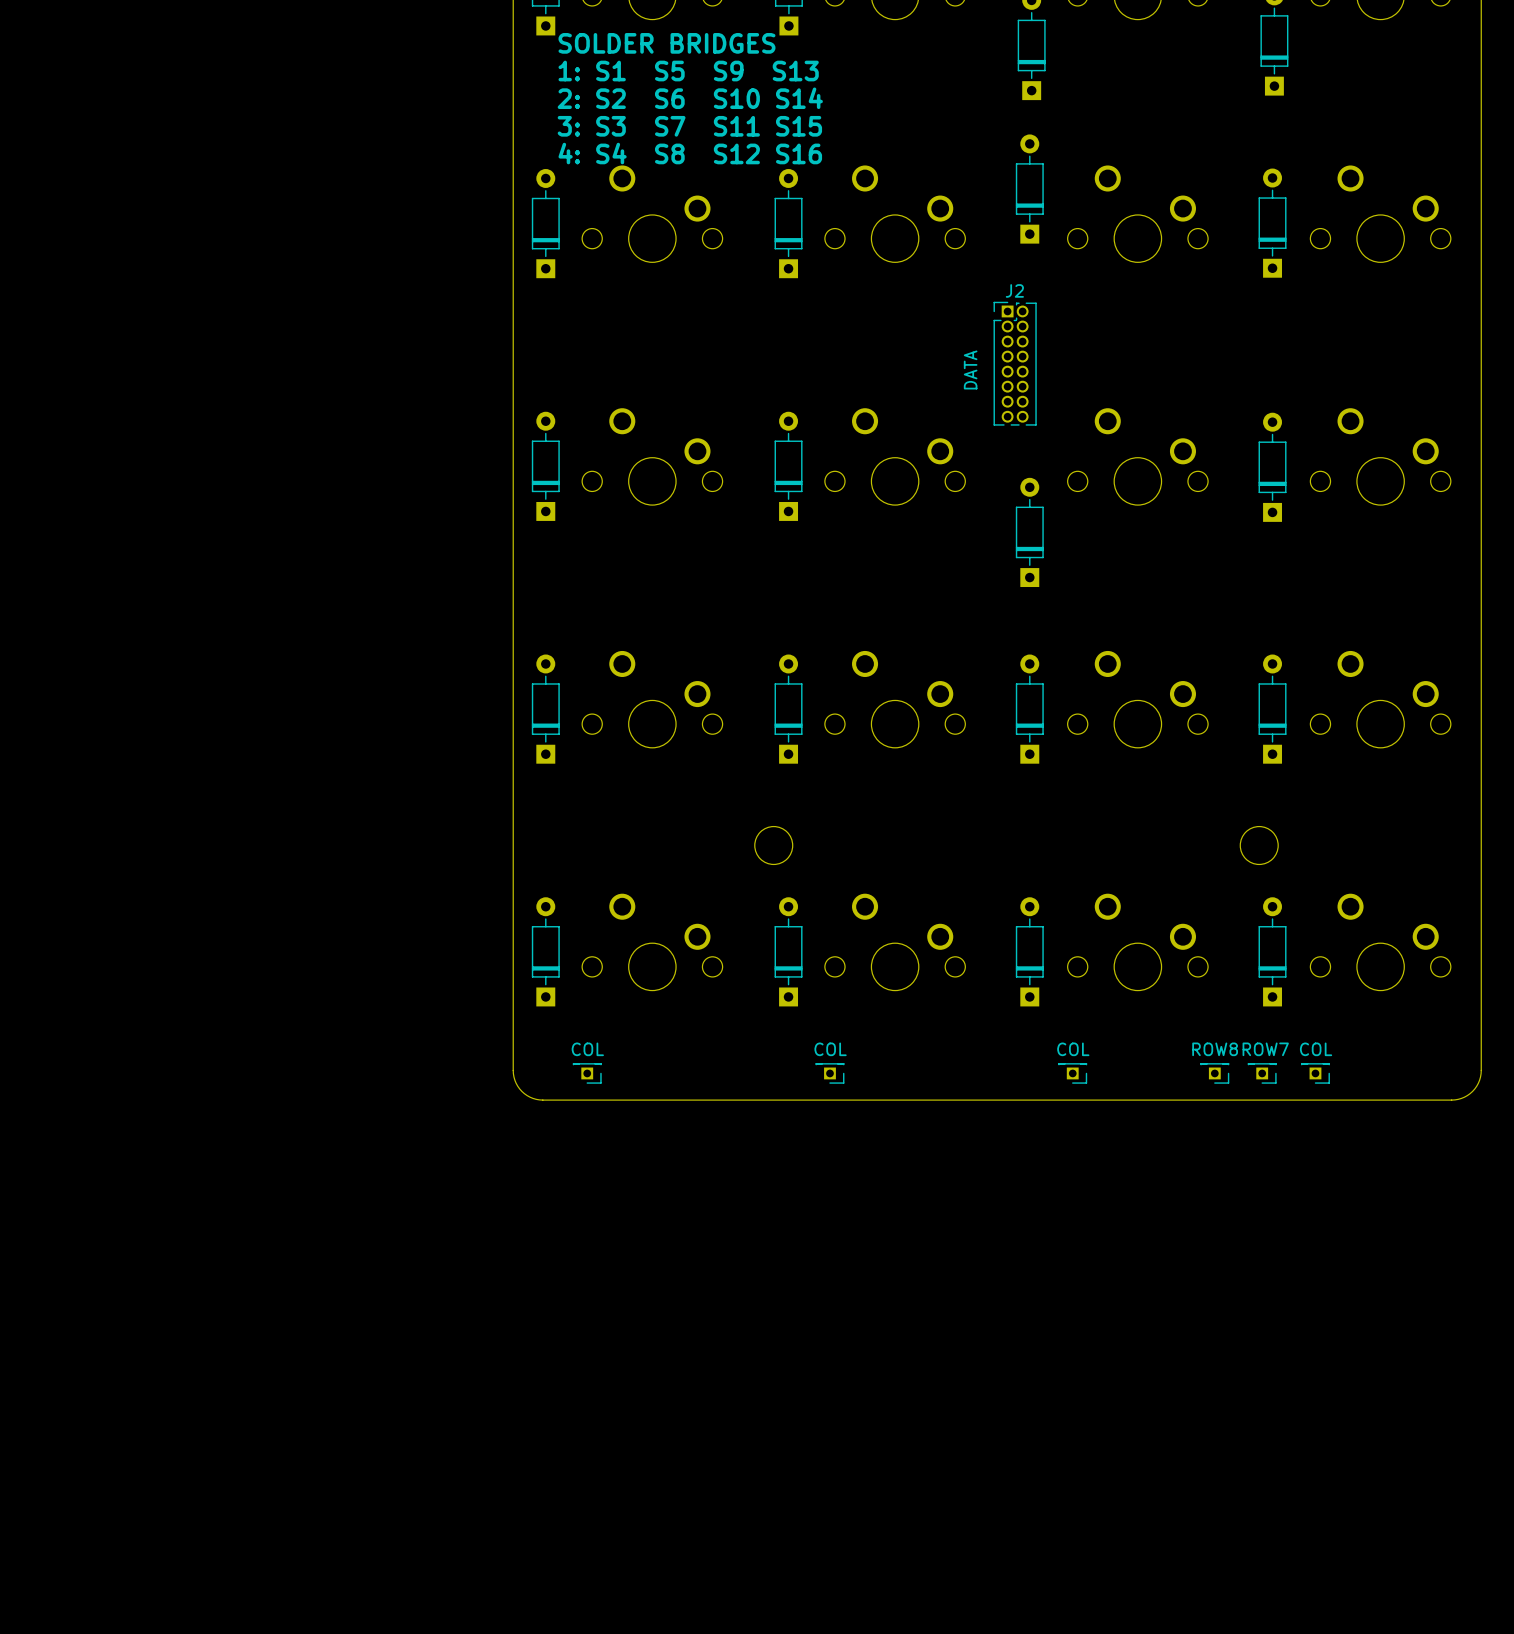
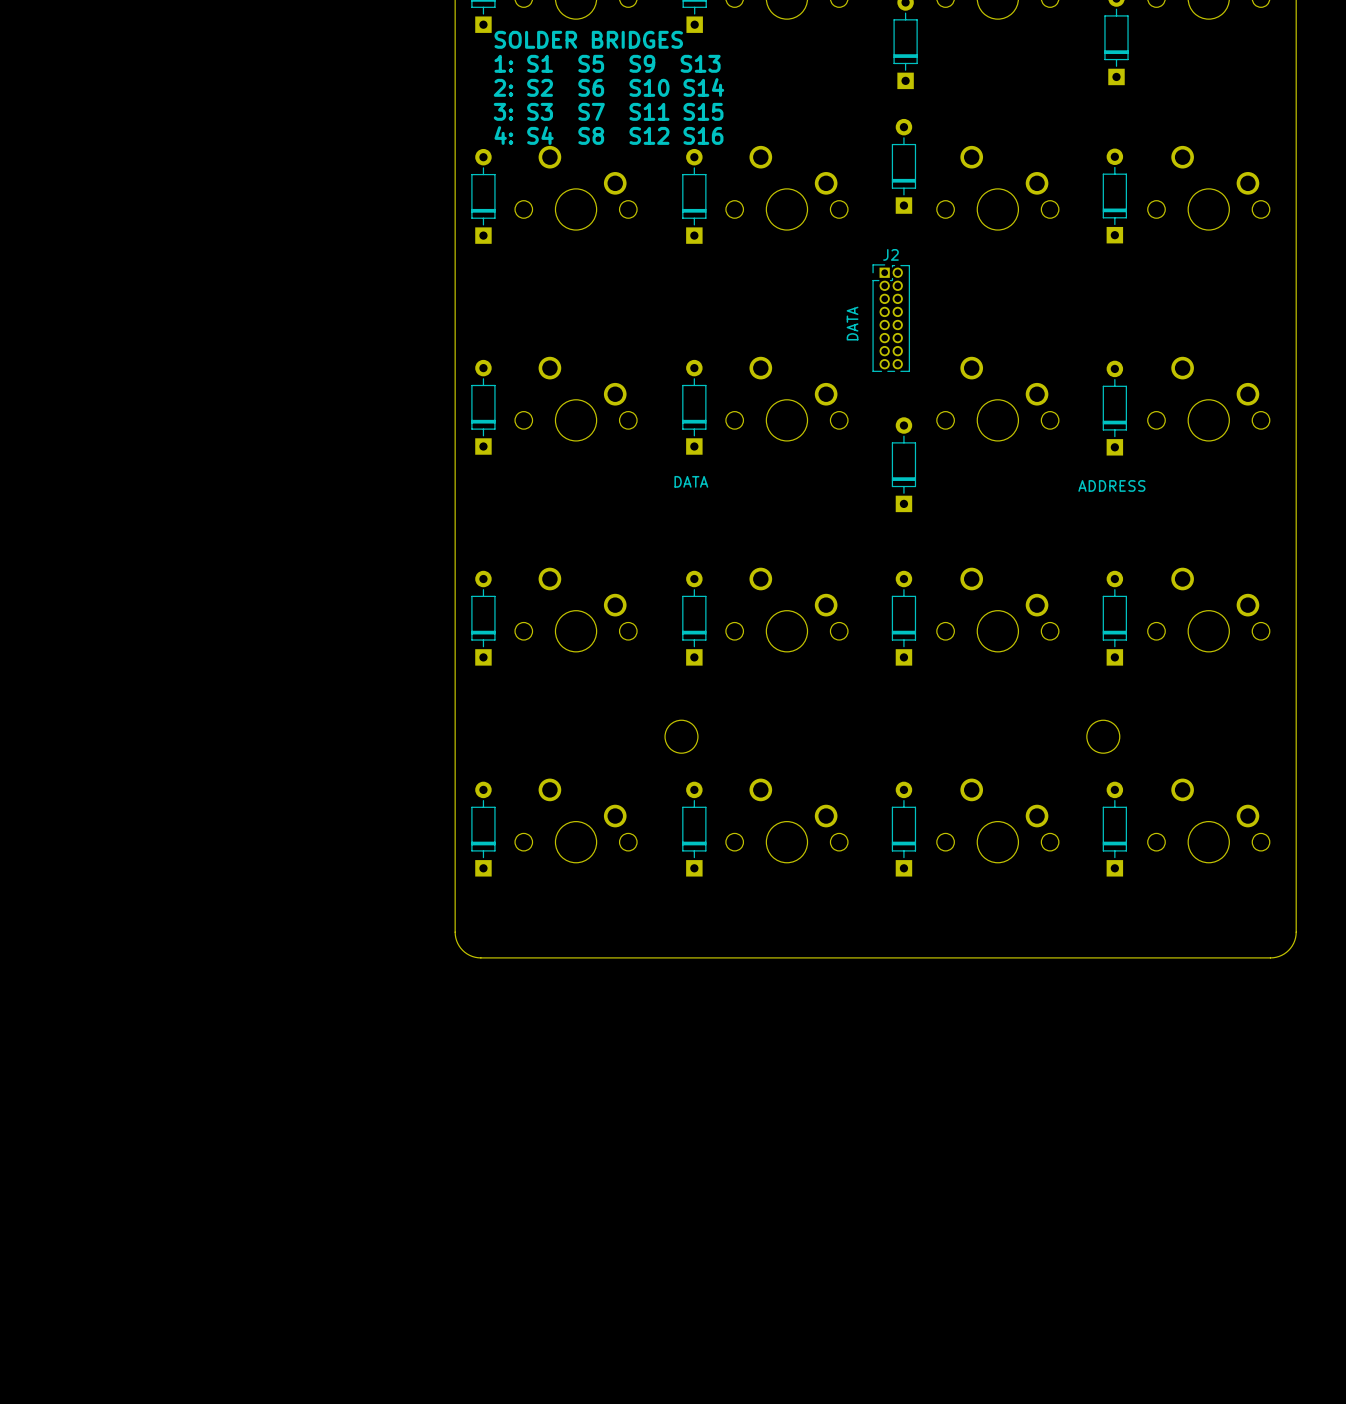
text: none -> DATA (691, 481)
text: none -> ADDRESS (1111, 485)
COL: (587, 1073) -> none
COL: (829, 1073) -> none
COL: (1072, 1073) -> none
ROW8: (1214, 1073) -> none
ROW7: (1262, 1073) -> none
COL: (1315, 1073) -> none

